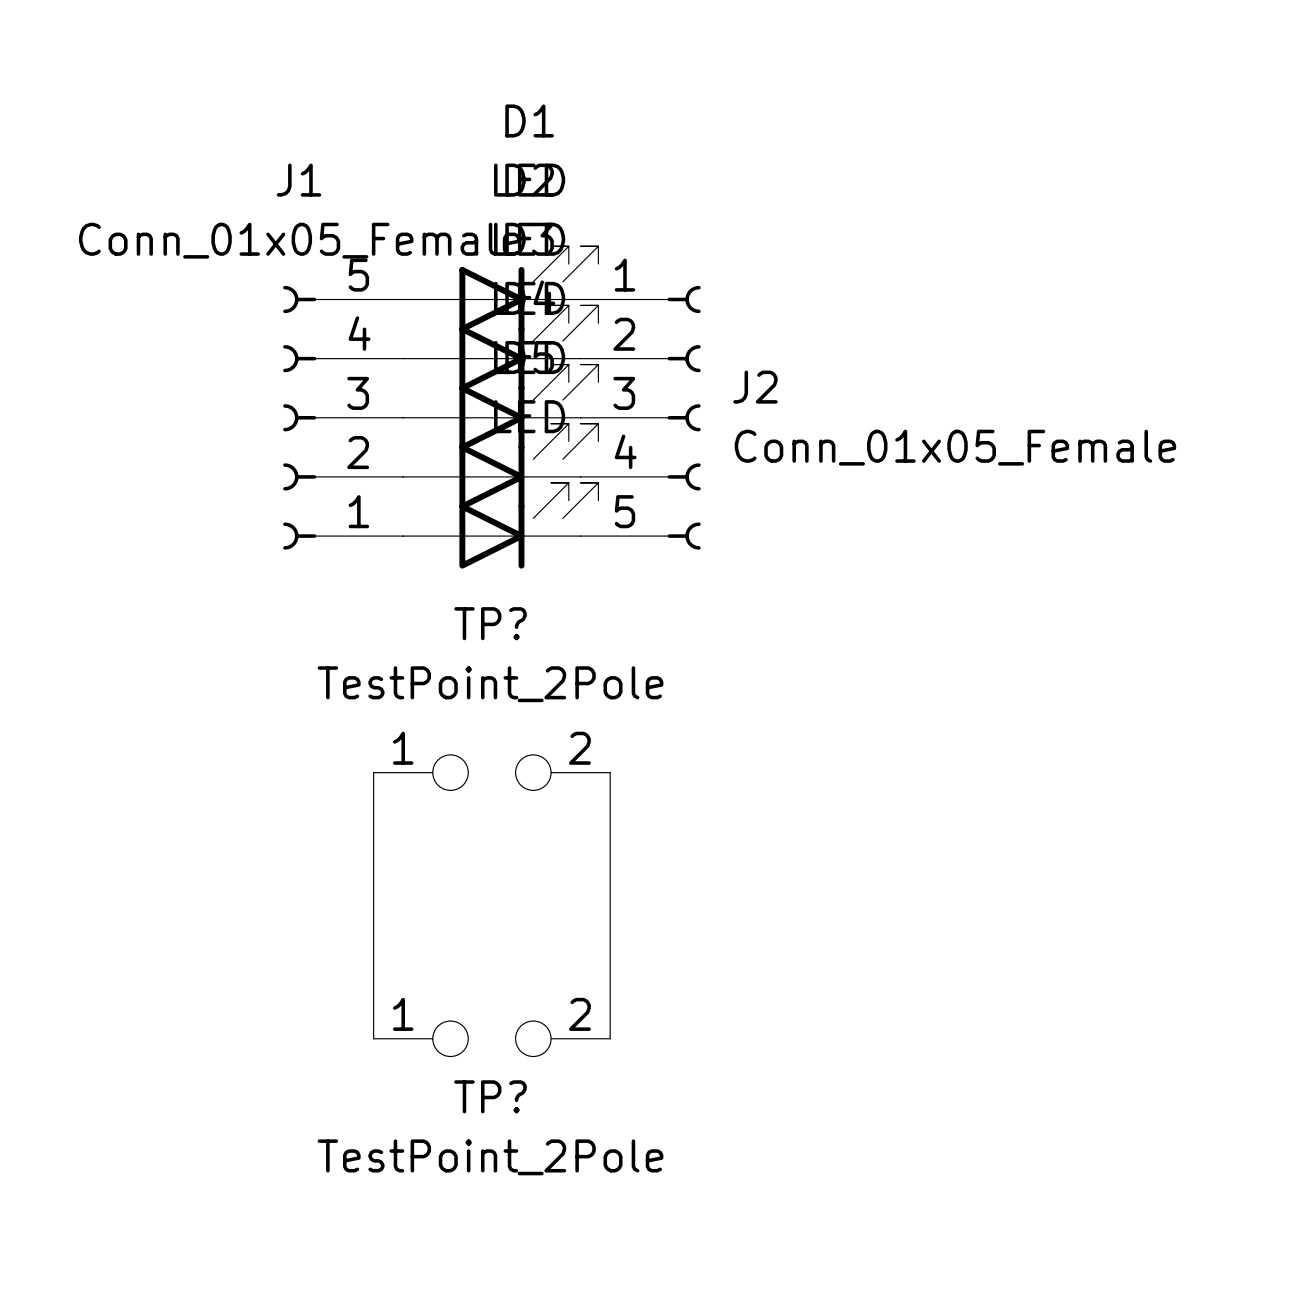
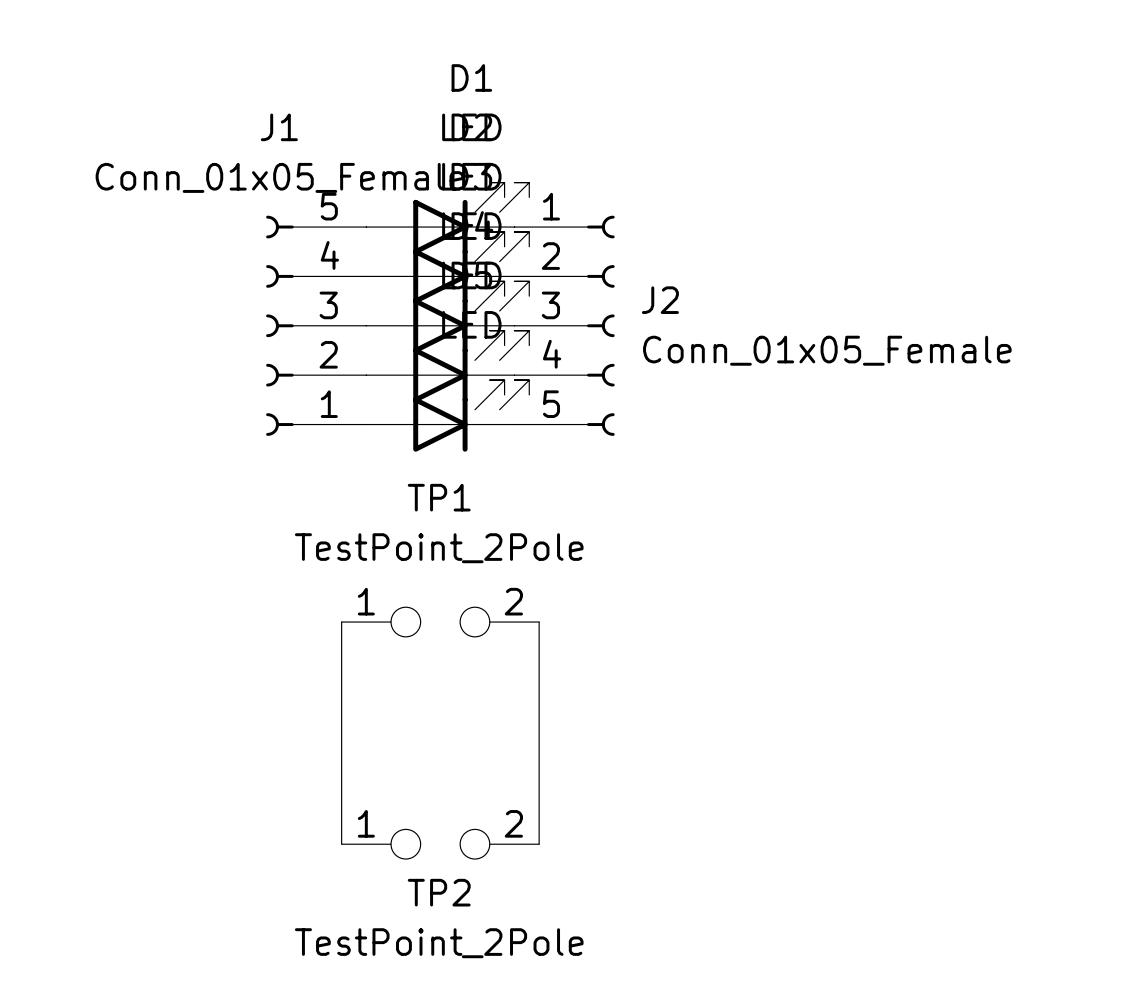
TP? name: TP? (490, 623) -> TP1 (439, 497)
TP? name: TP? (490, 1096) -> TP2 (439, 892)

